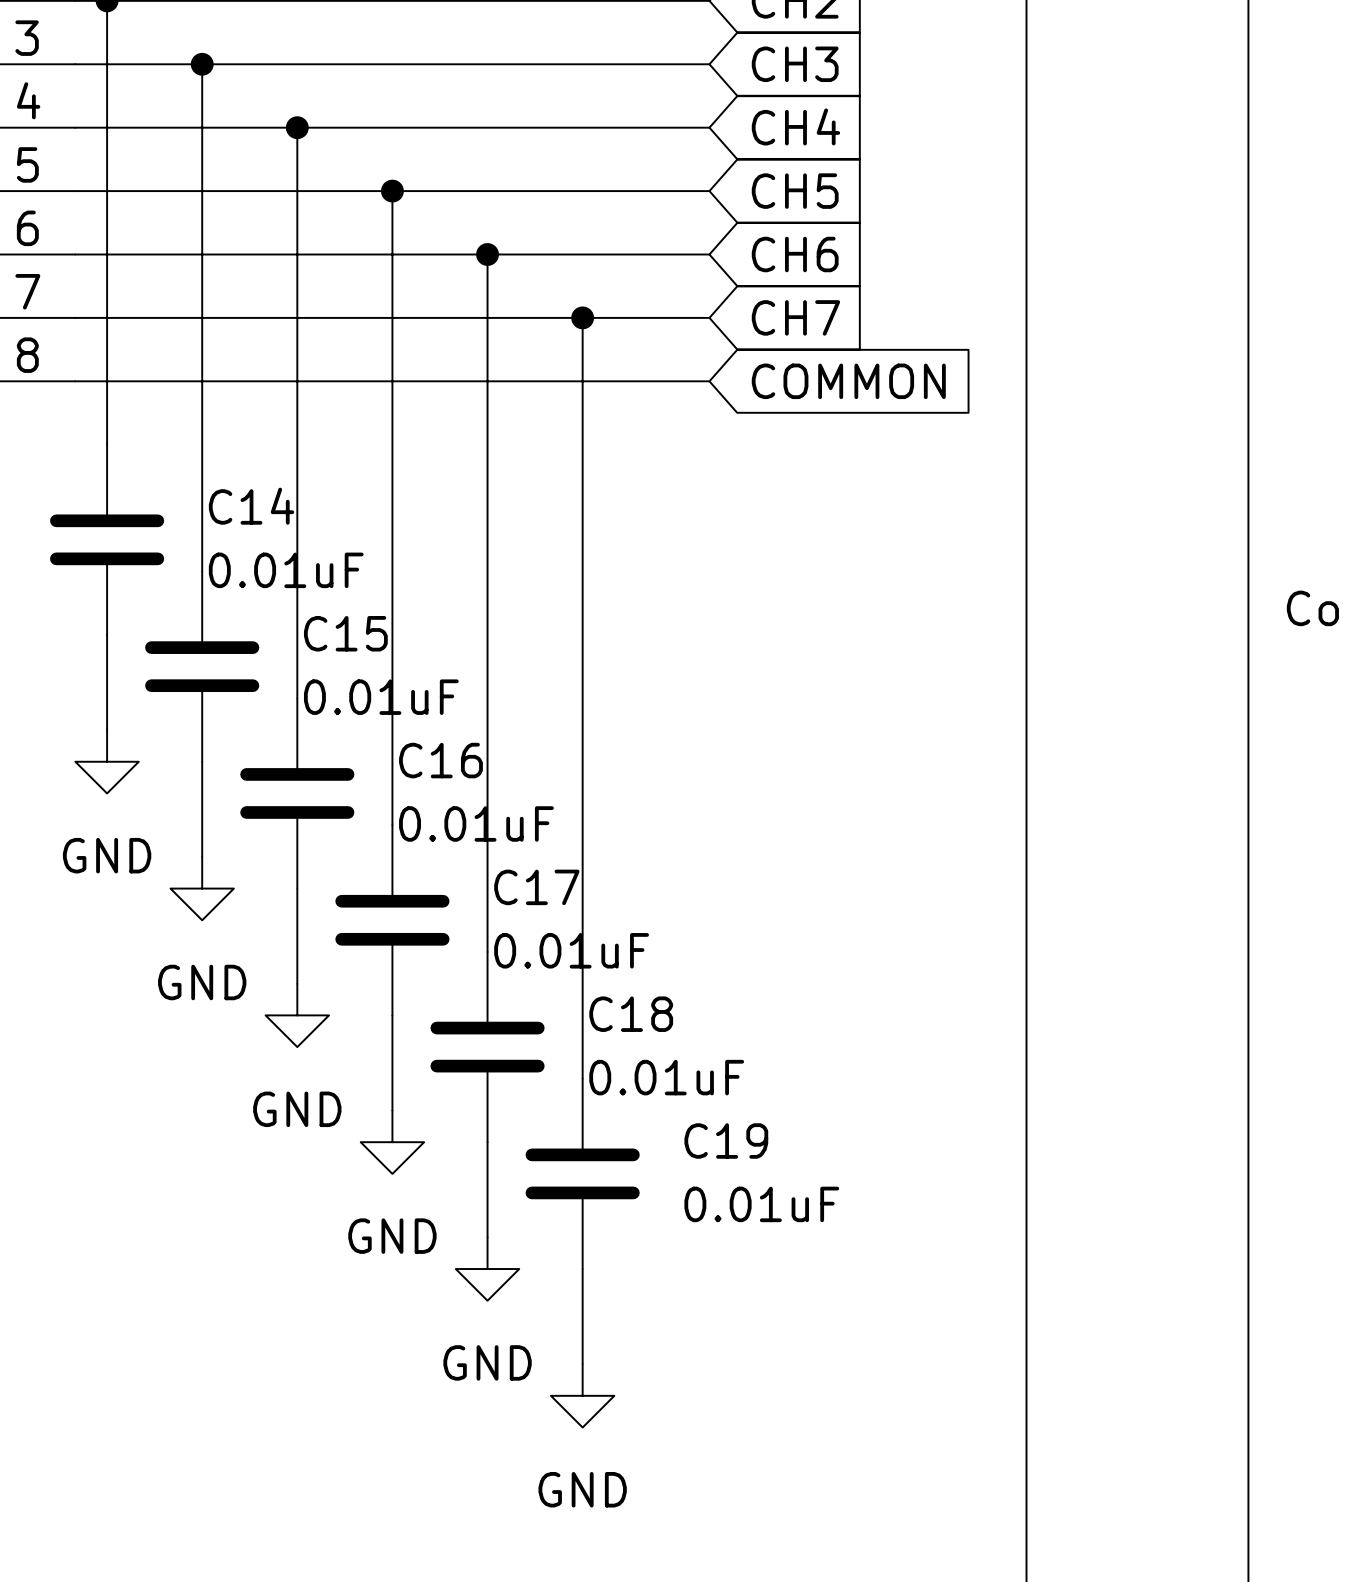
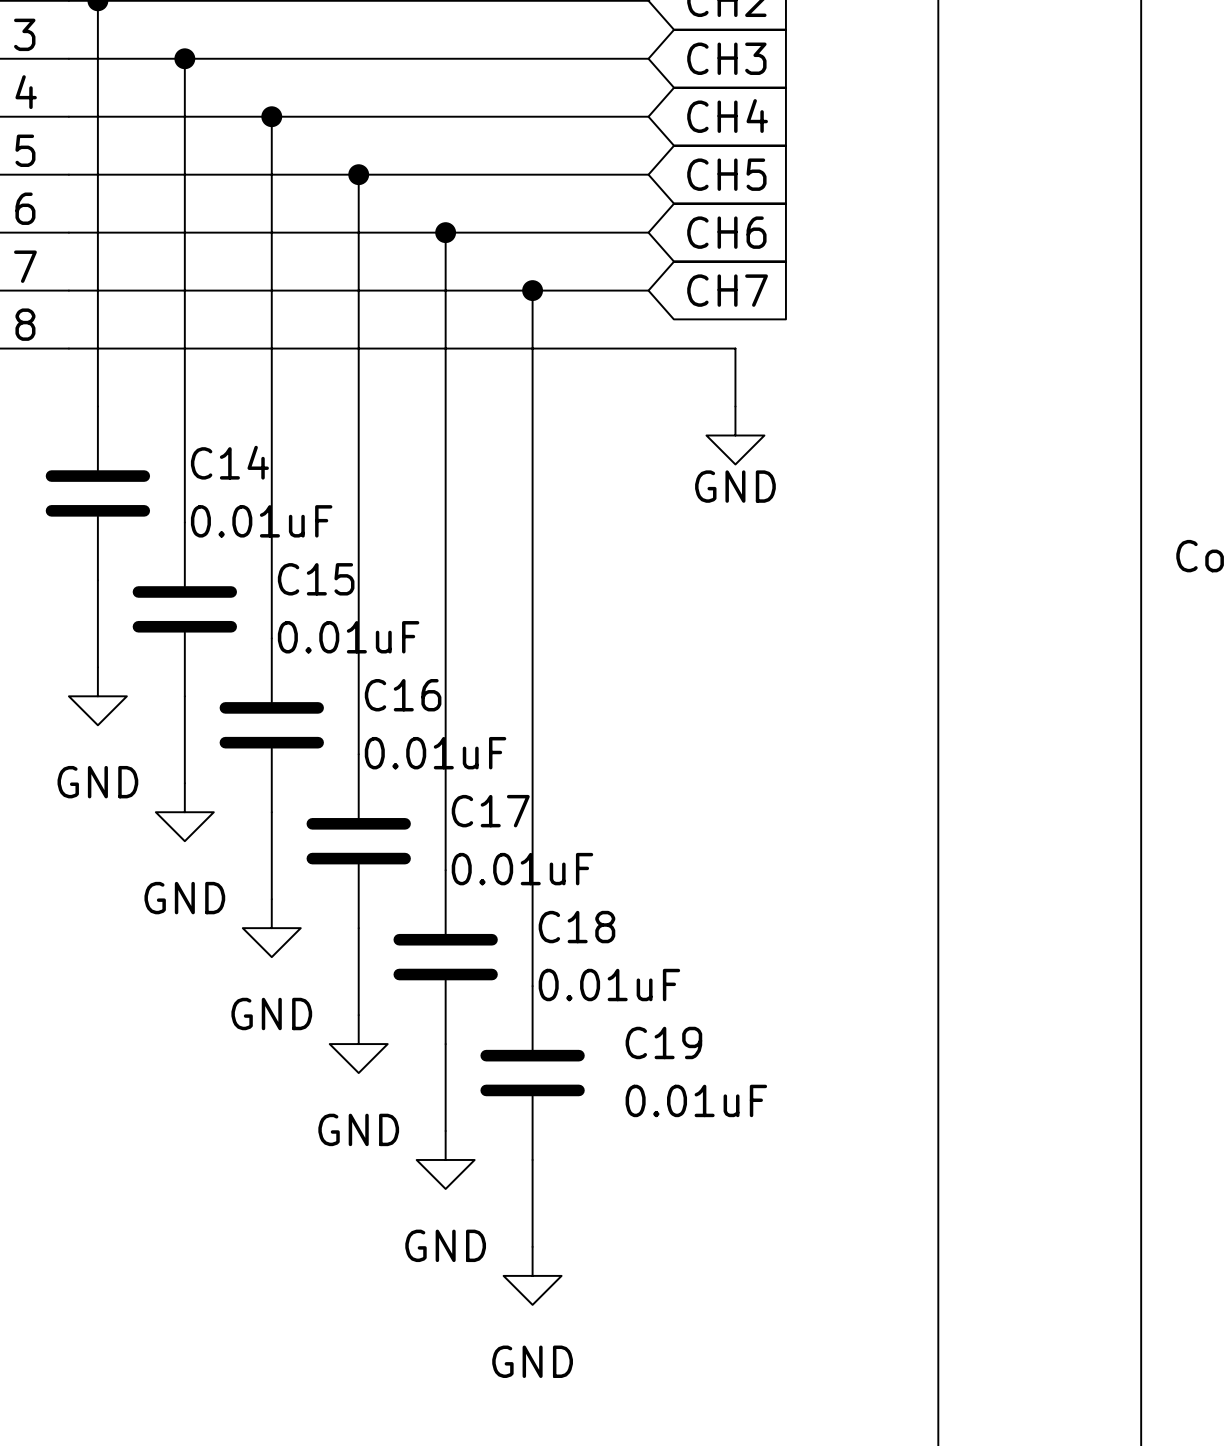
wire: none -> (648, 348) (735, 348) (735, 406)
global label: COMMON (848, 381) -> none
power symbol: none -> GND (735, 435)

